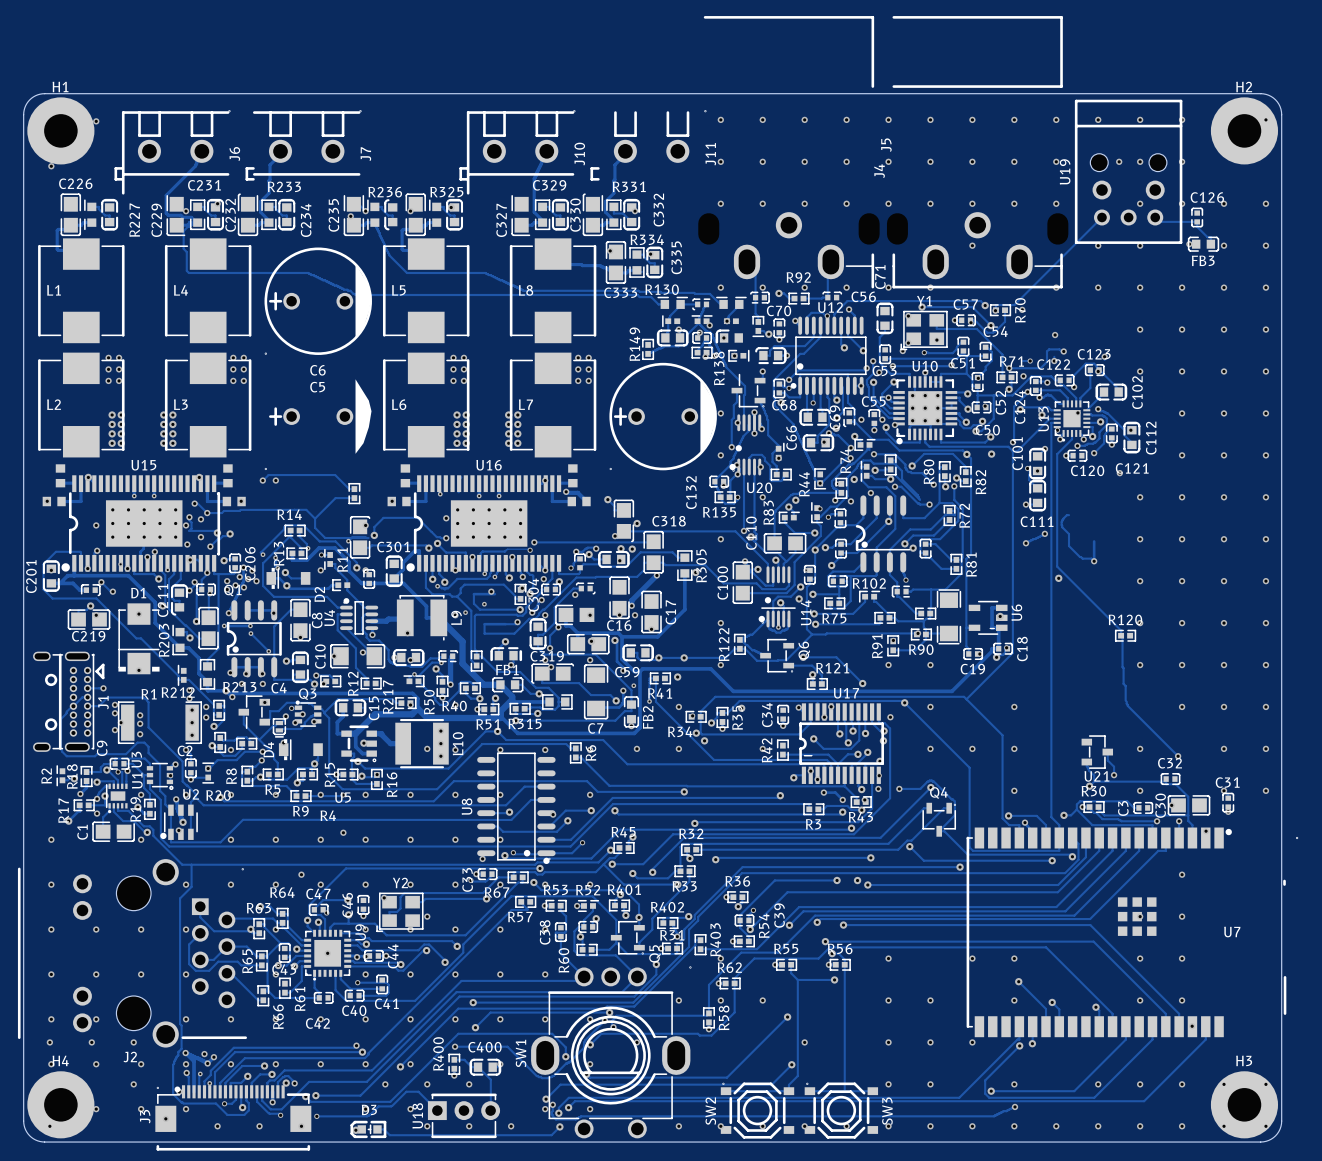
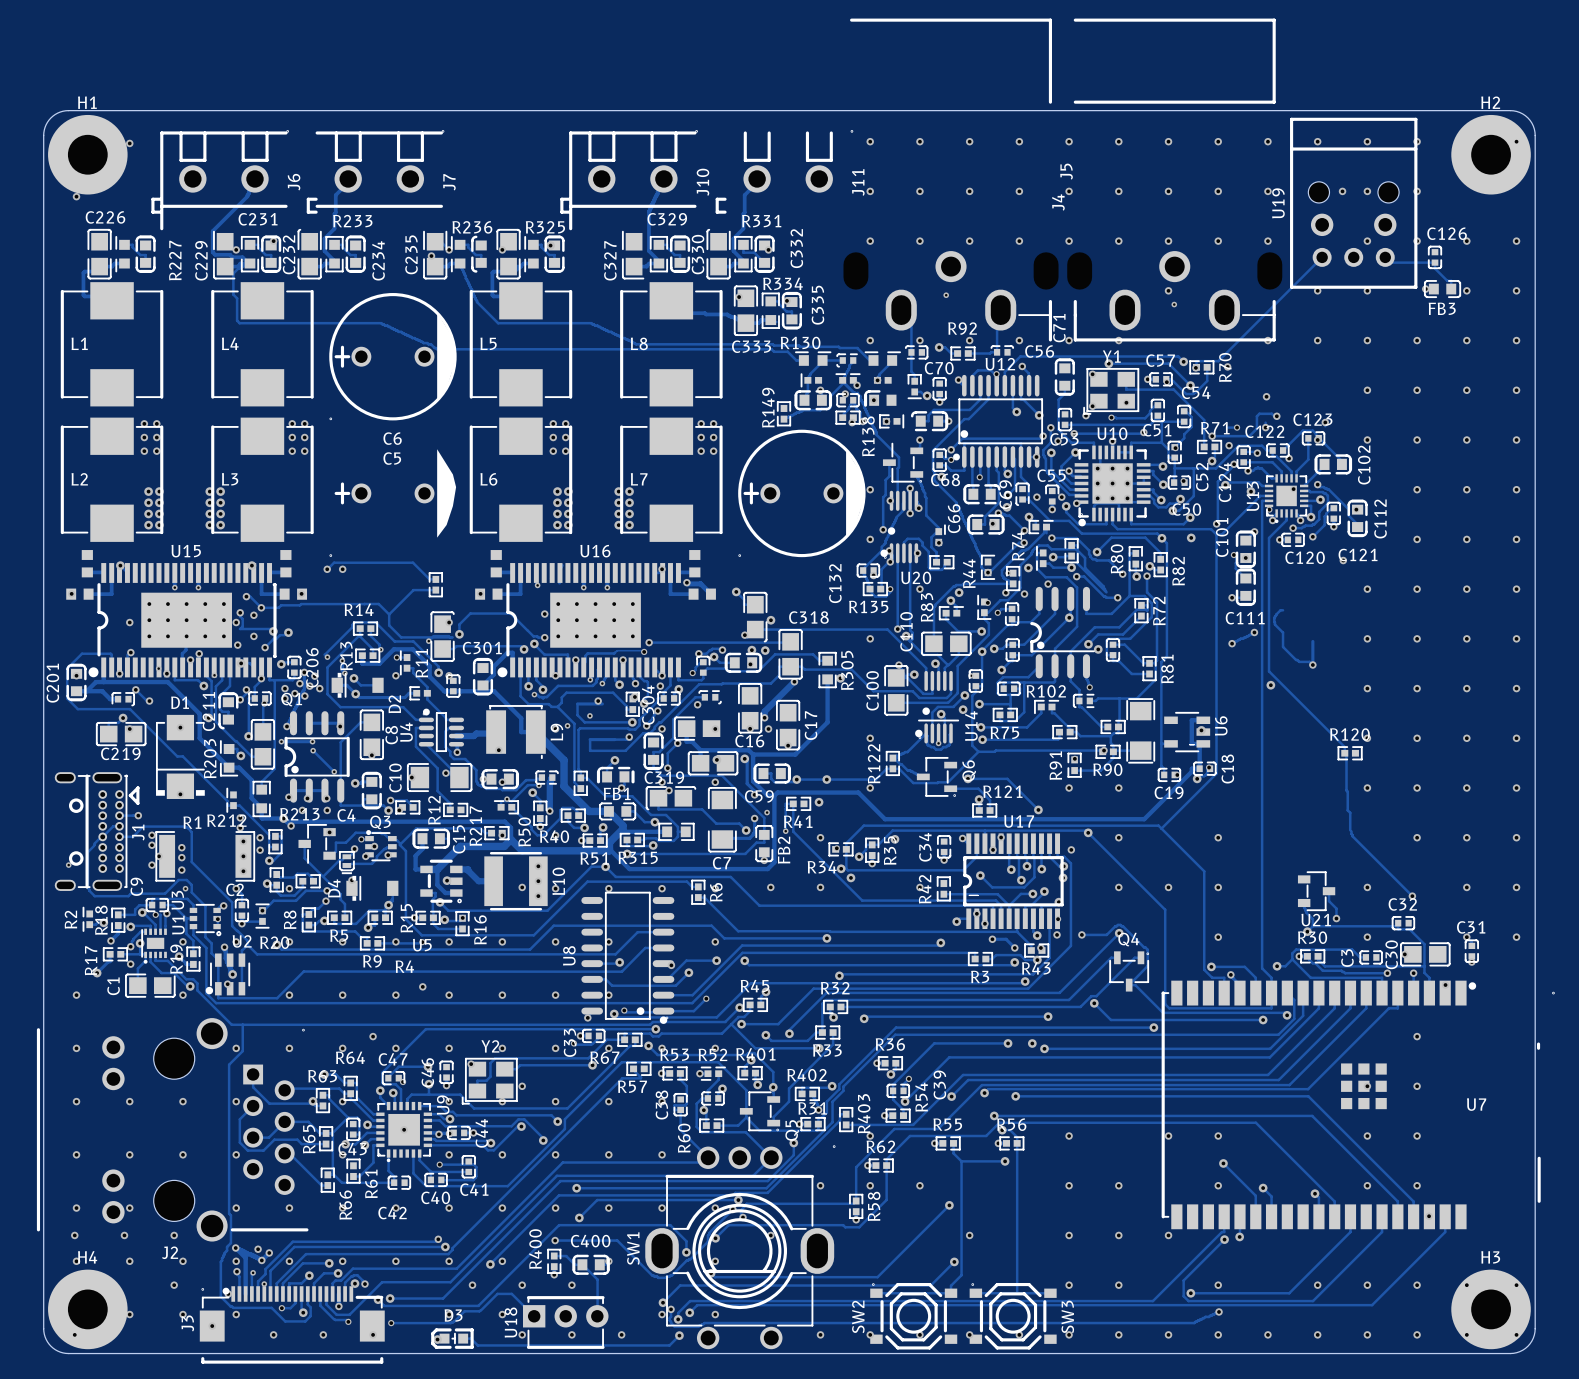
via: none -> (946, 295)
via: none -> (1174, 304)
via: none -> (68, 865)
via: none -> (185, 888)

